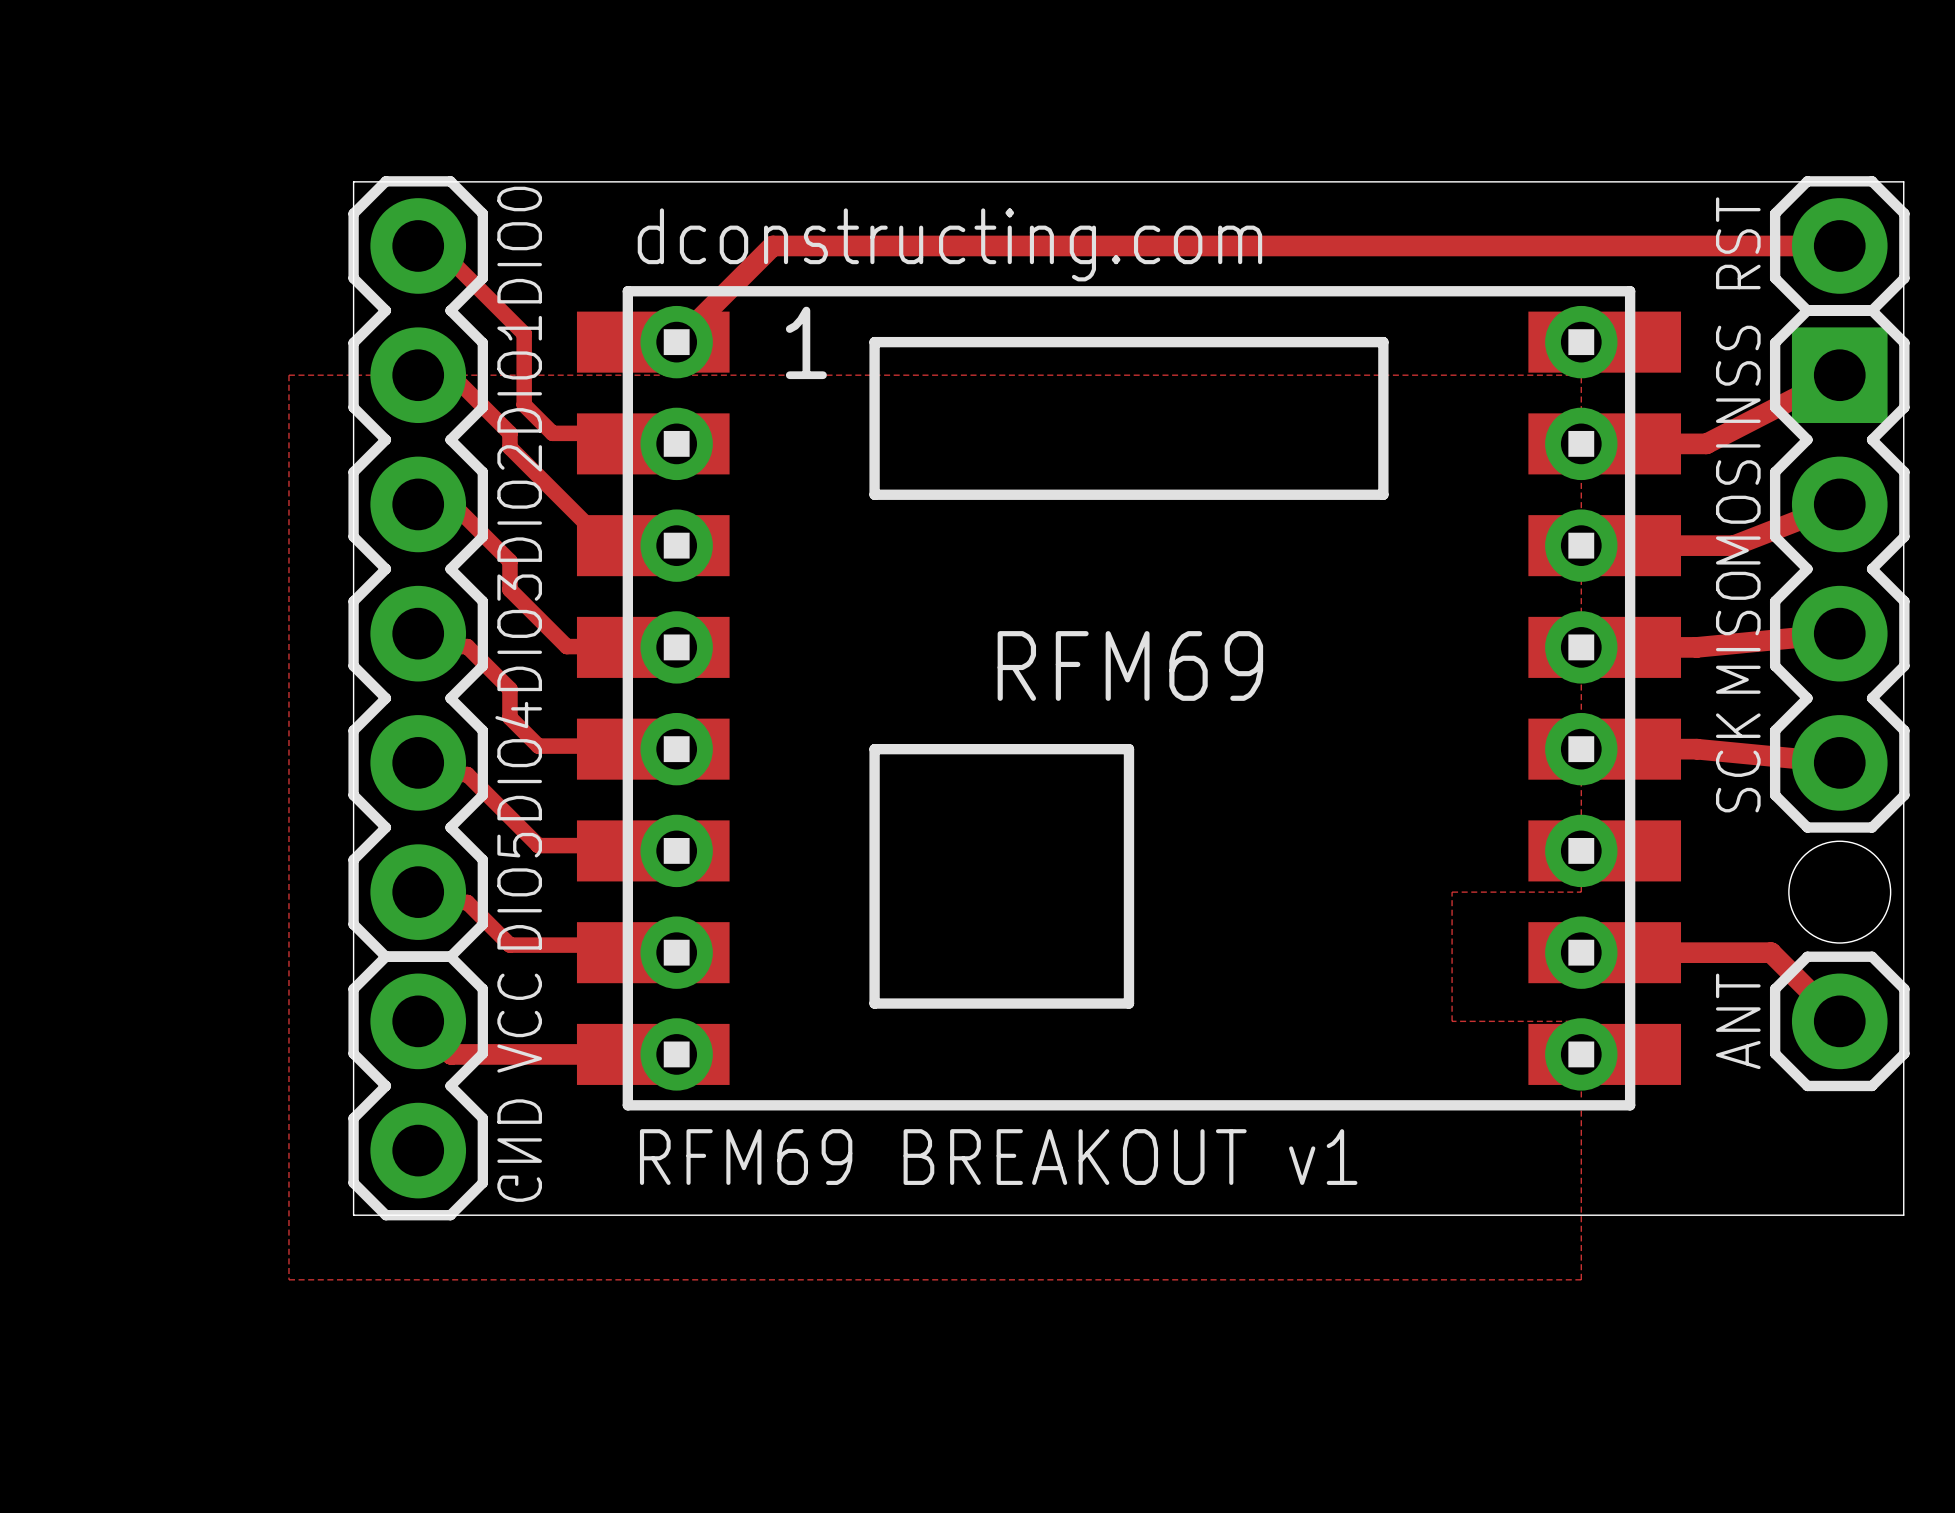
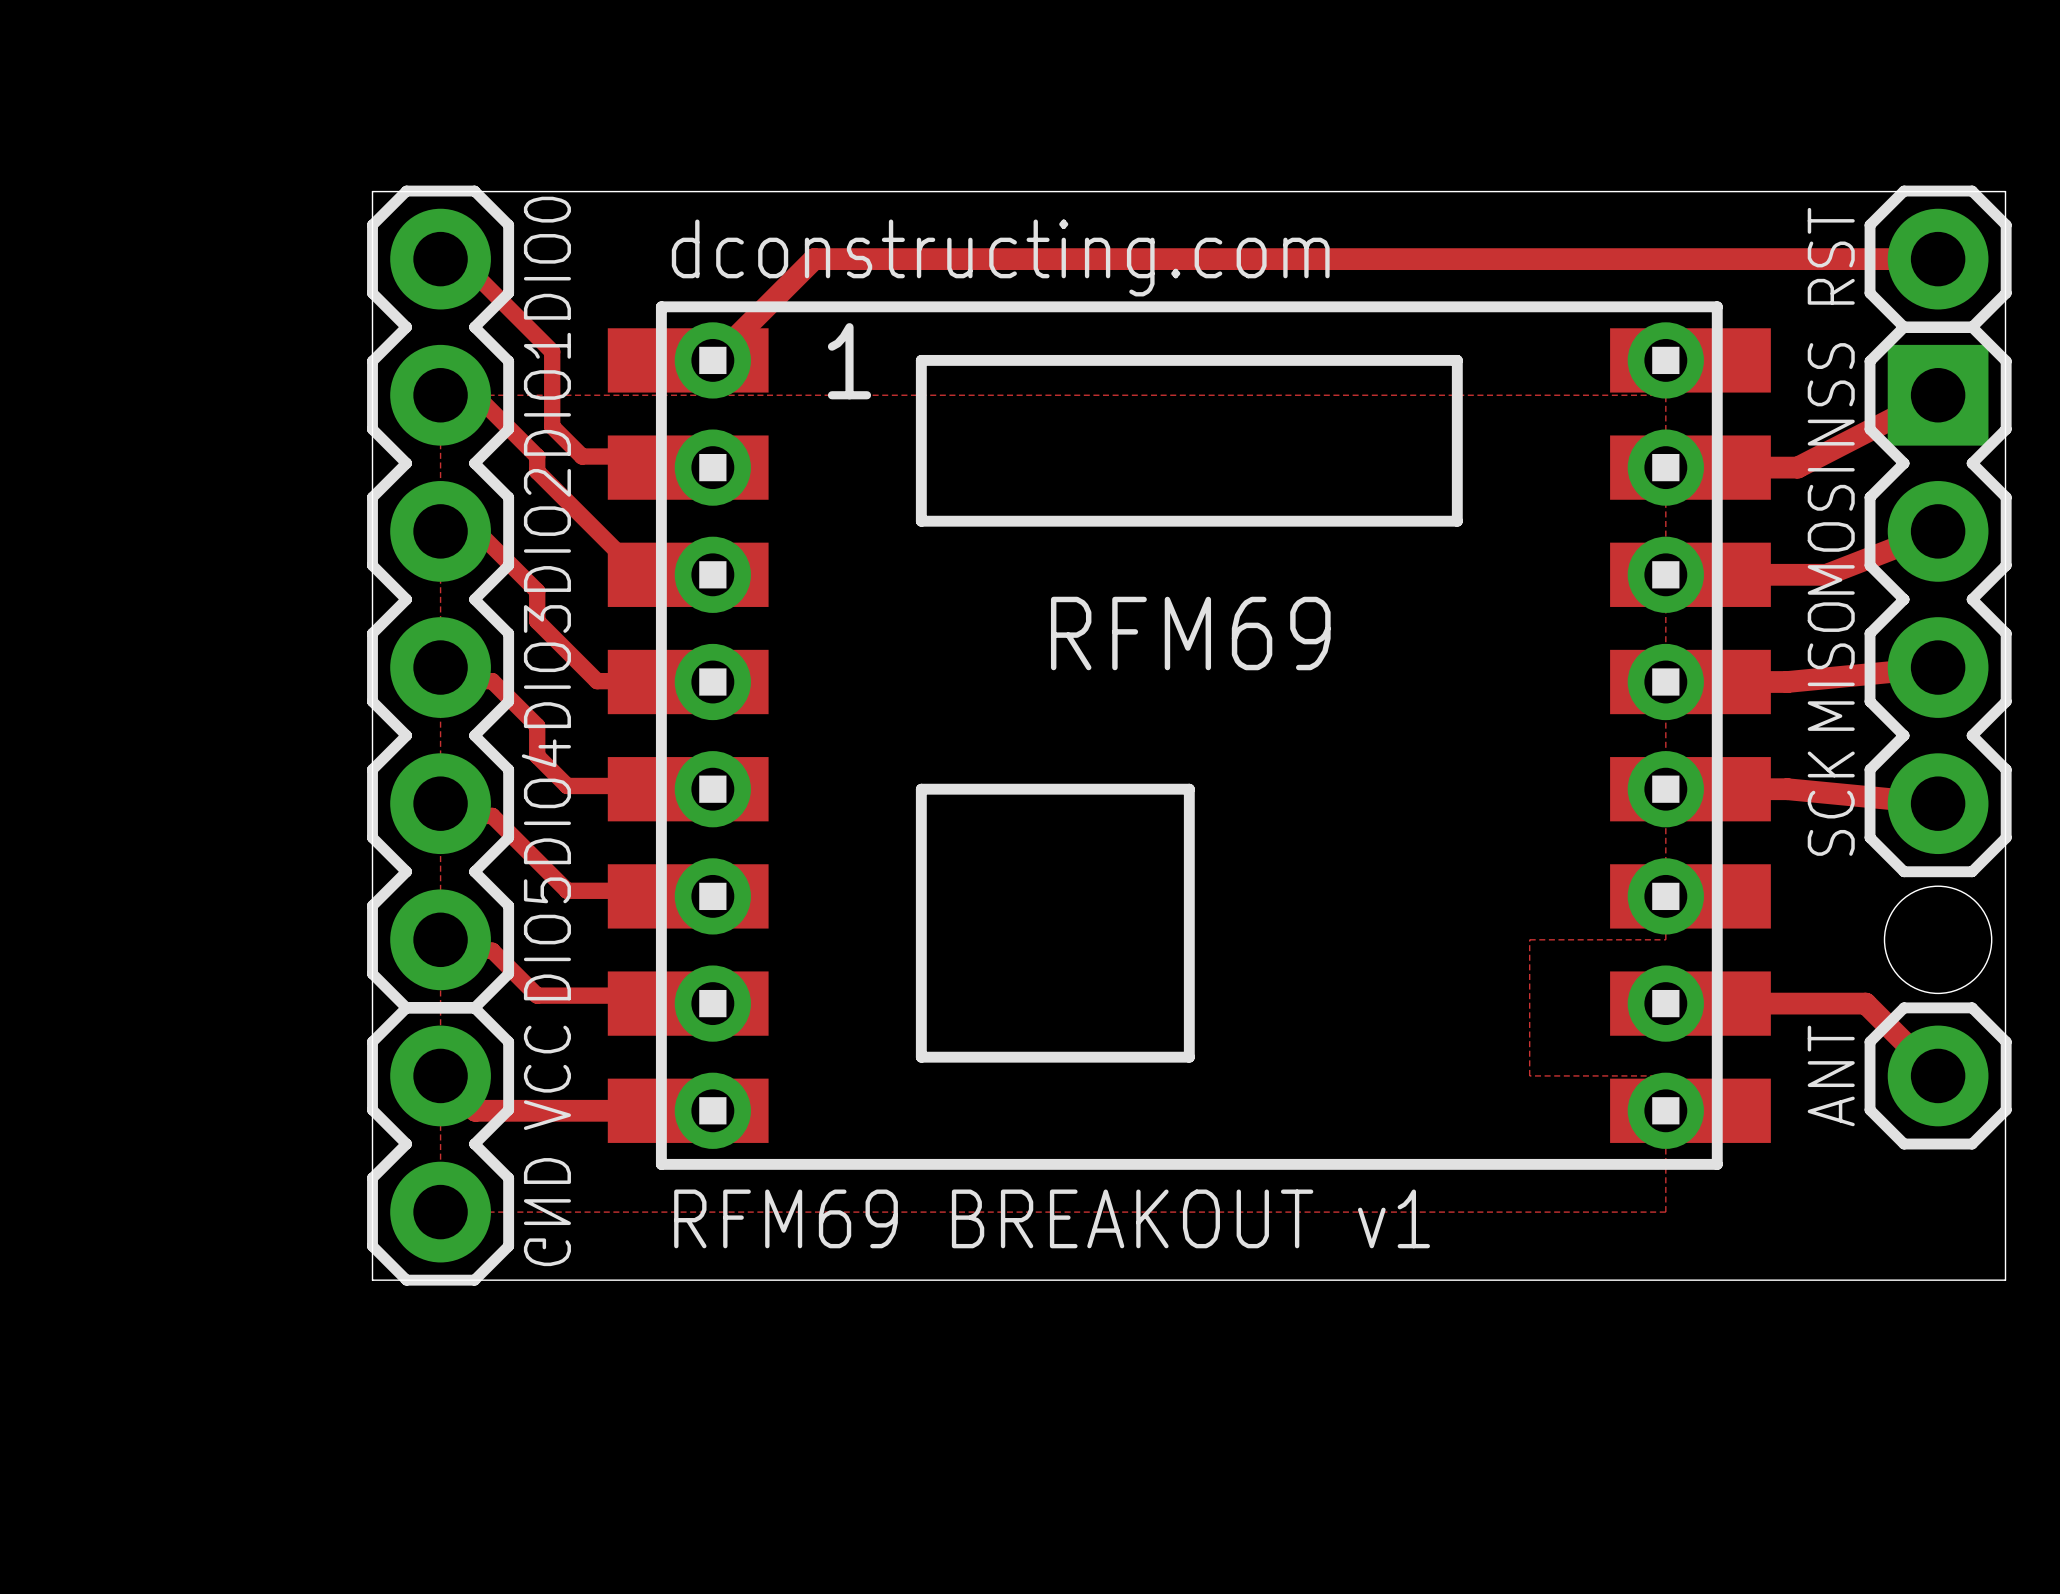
top zone outline: (418, 375) (288, 375) (288, 1279) (1581, 1279) (1581, 1150) -> (440, 395) (440, 1212) (1665, 1212)
text position: RFM69 (1130, 665) -> RFM69 (1190, 633)

